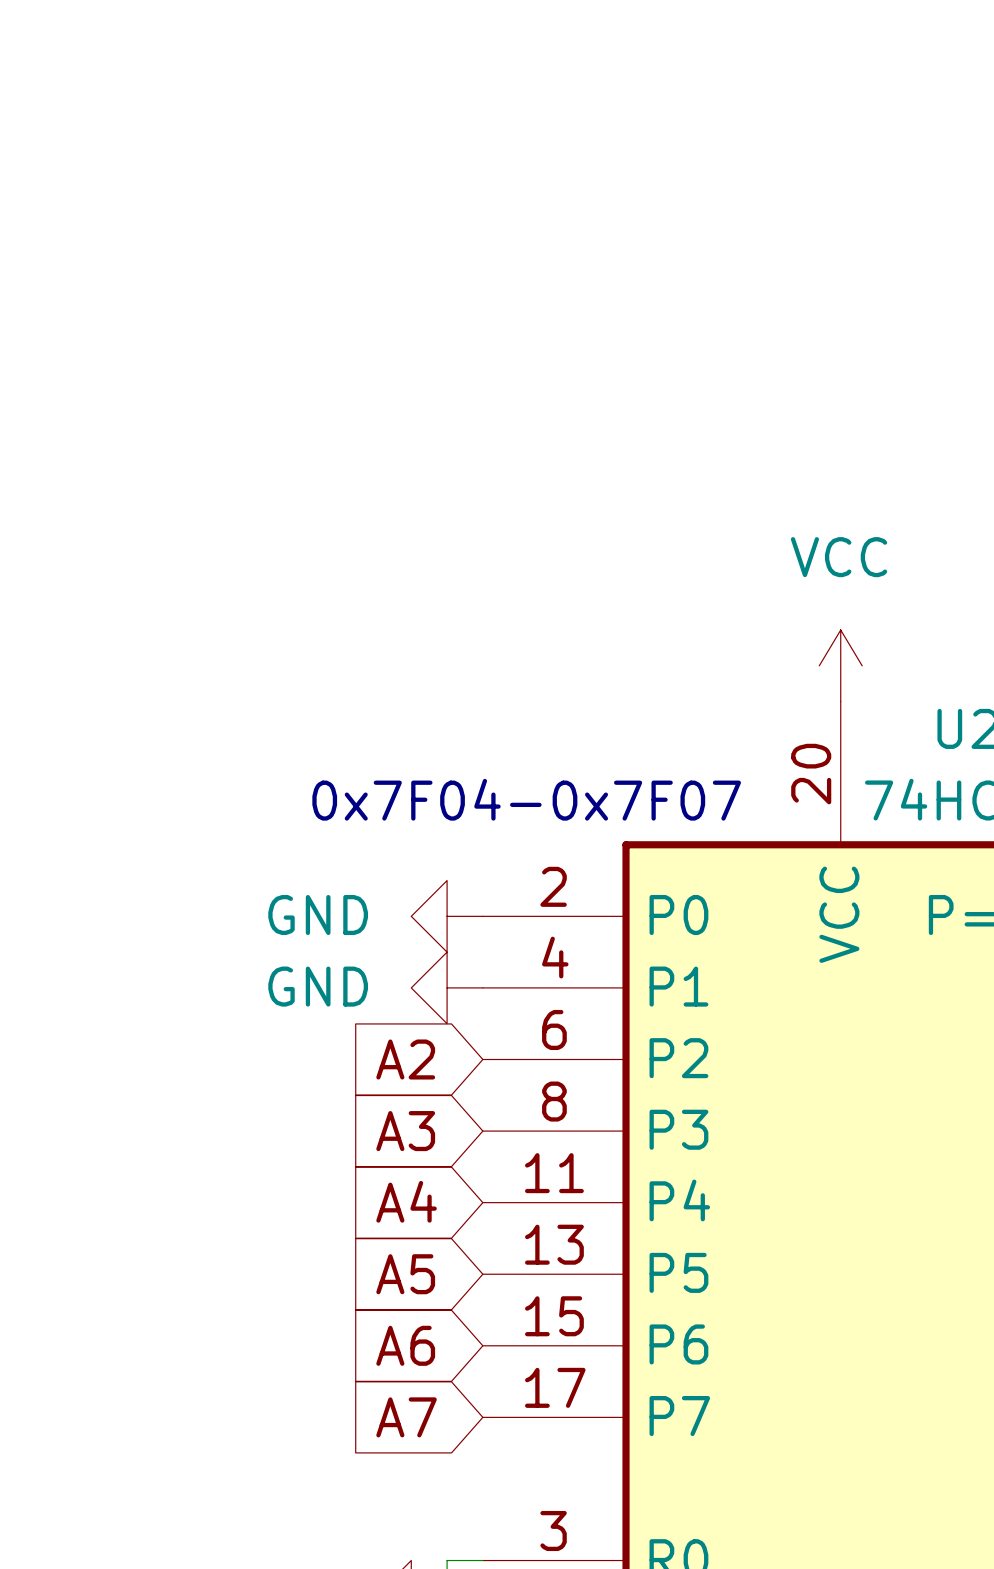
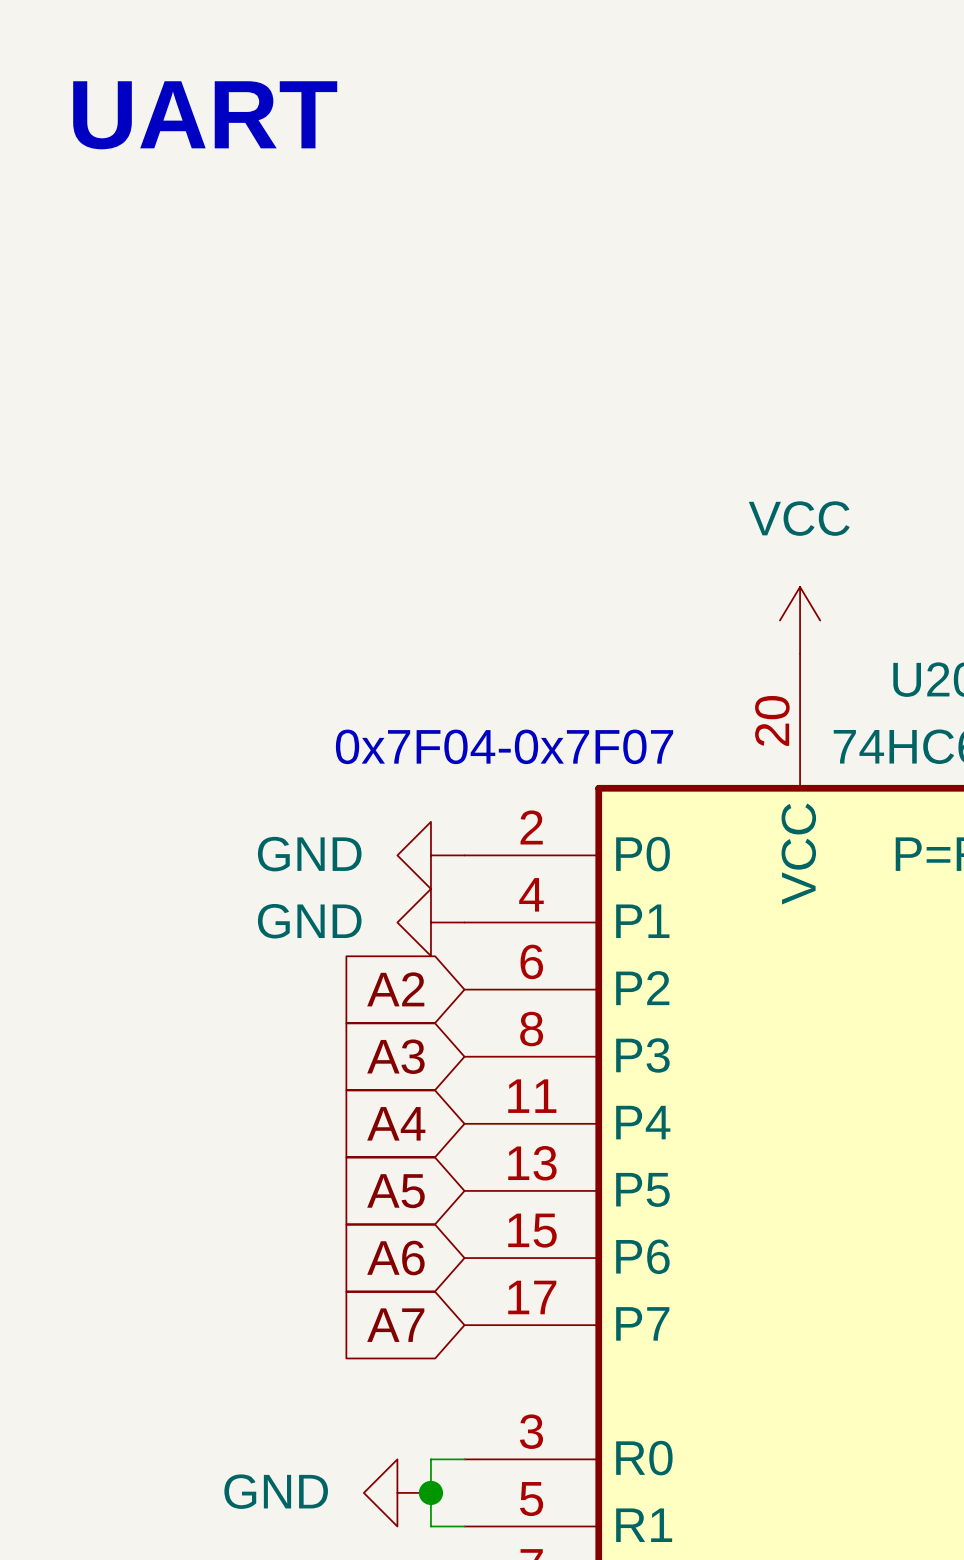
text: none -> UART (205, 115)

